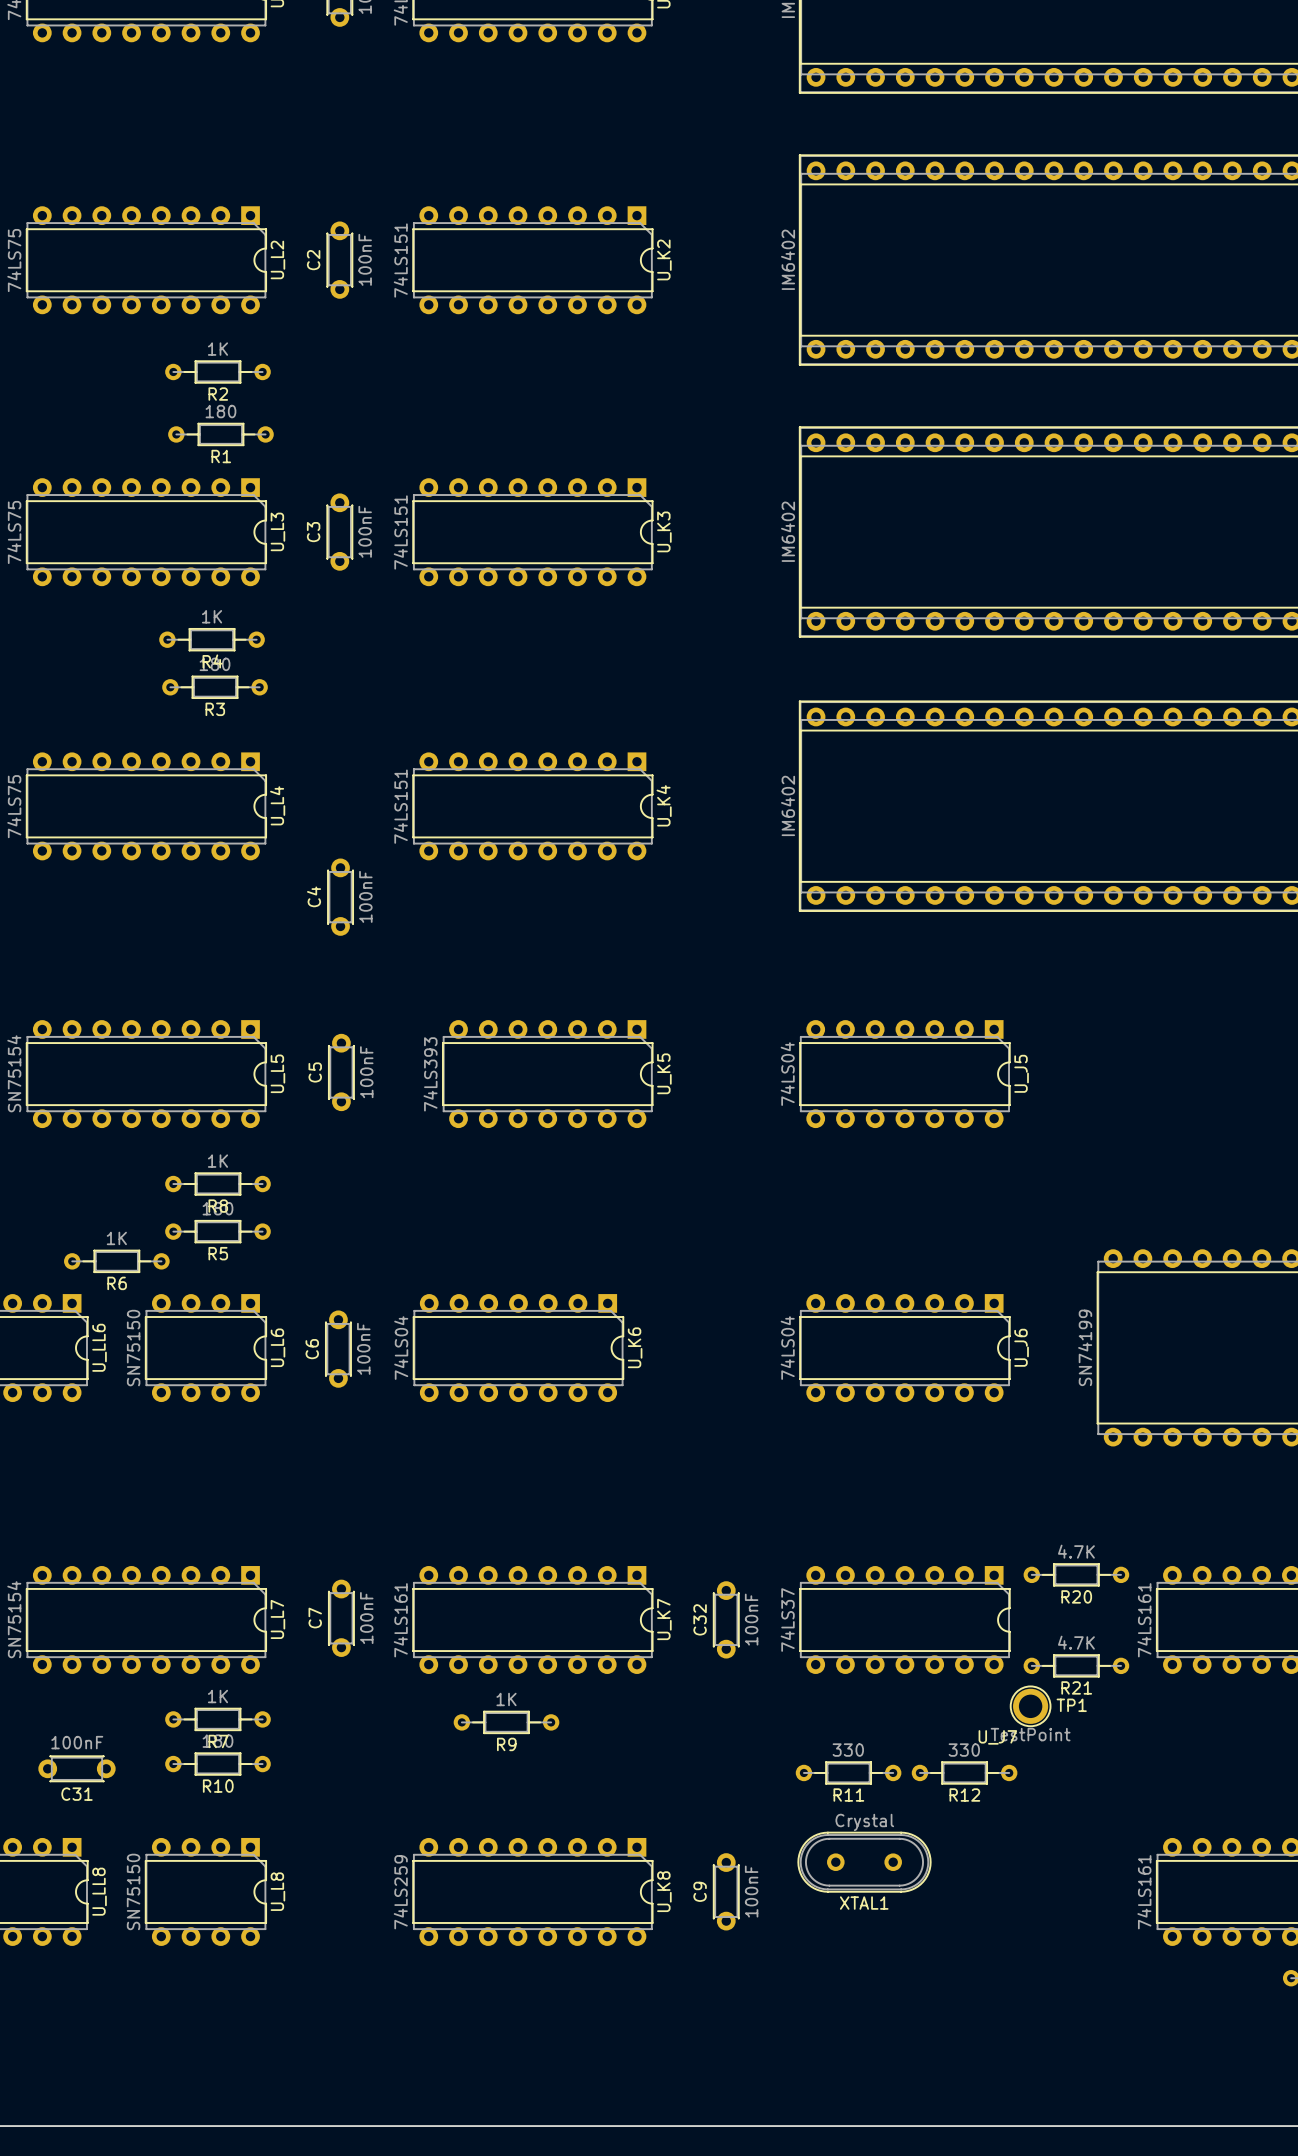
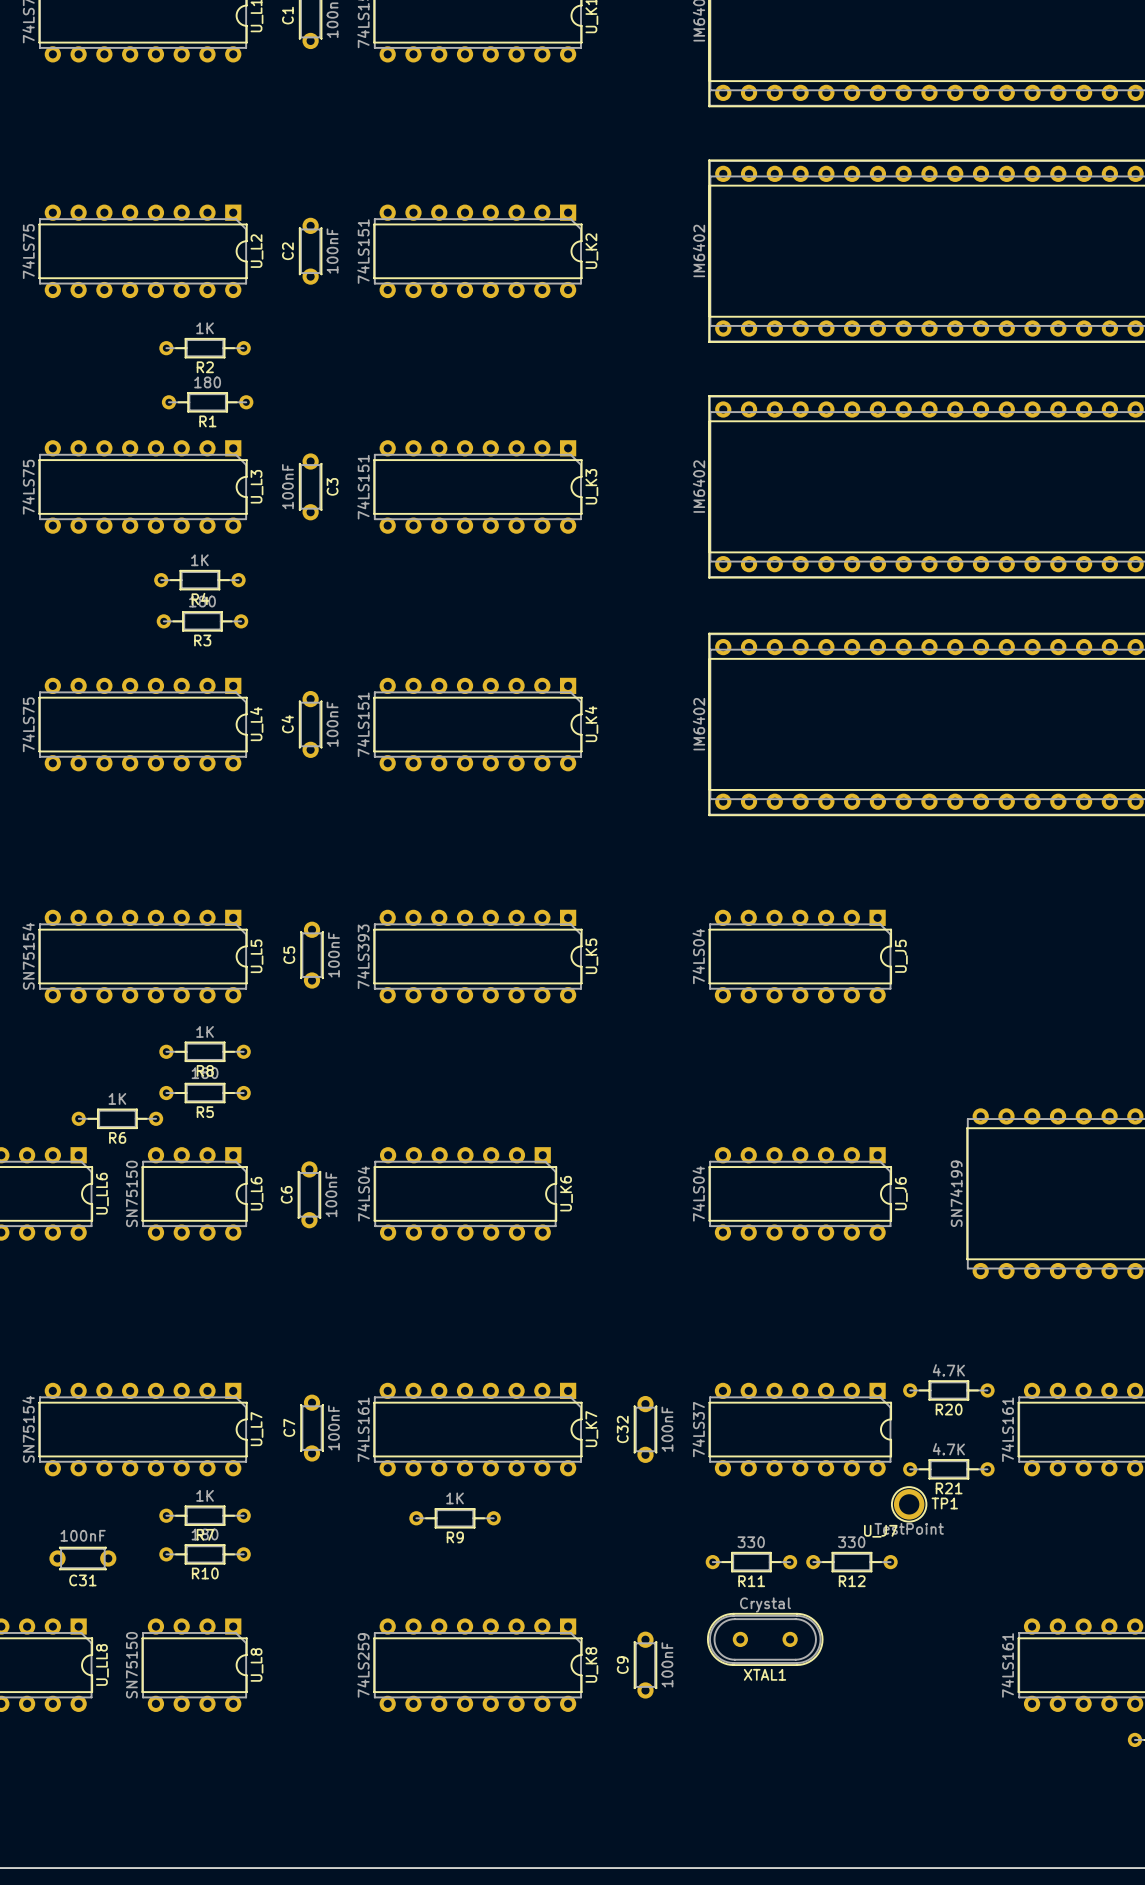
C3 value position: 100nF (365, 531) -> 100nF (287, 486)
C3 name position: C3 (313, 532) -> C3 (332, 486)
C4 position: (340, 897) -> (310, 724)
U_K5 footprint: [442, 1020, 654, 1129] -> [373, 909, 583, 1004]

